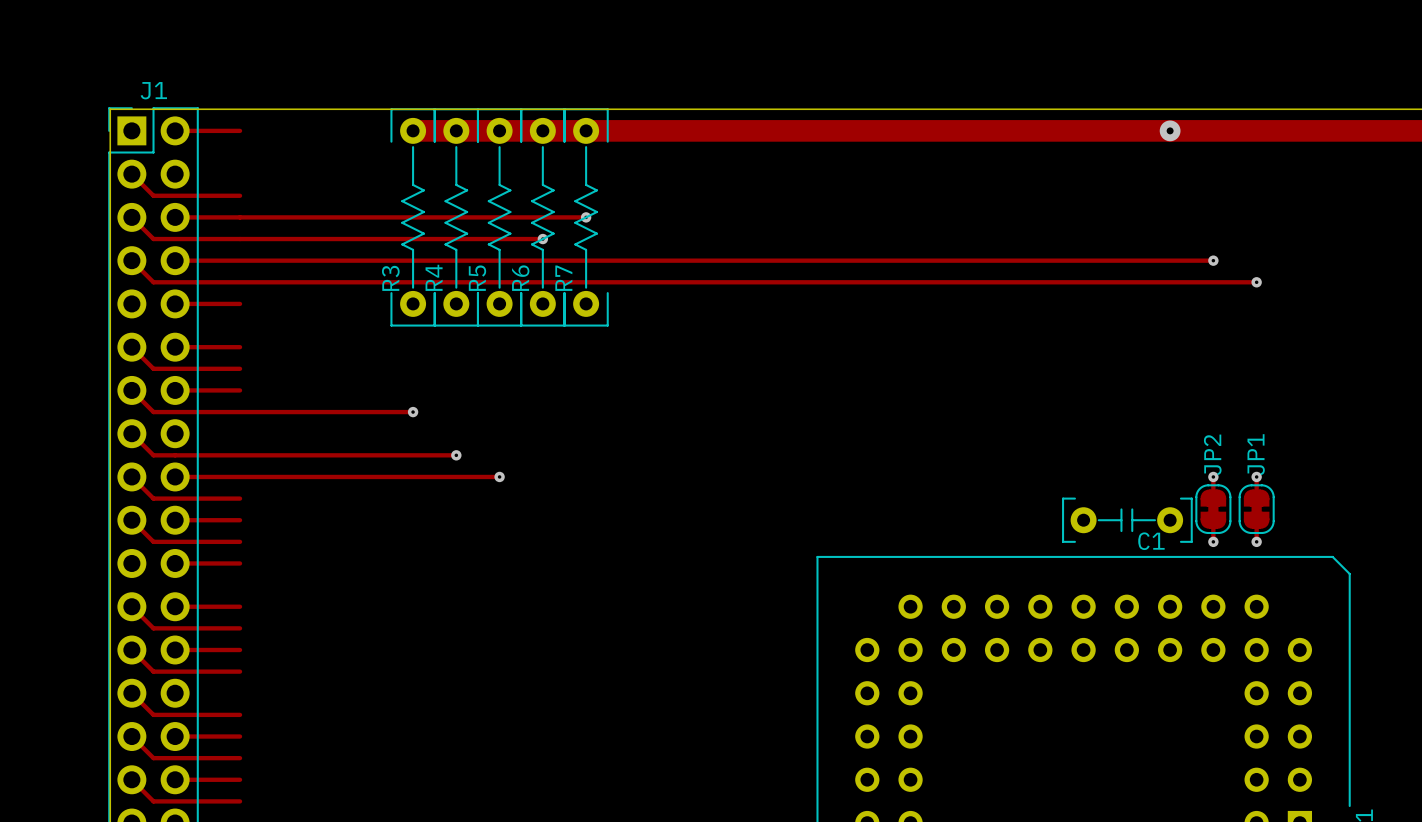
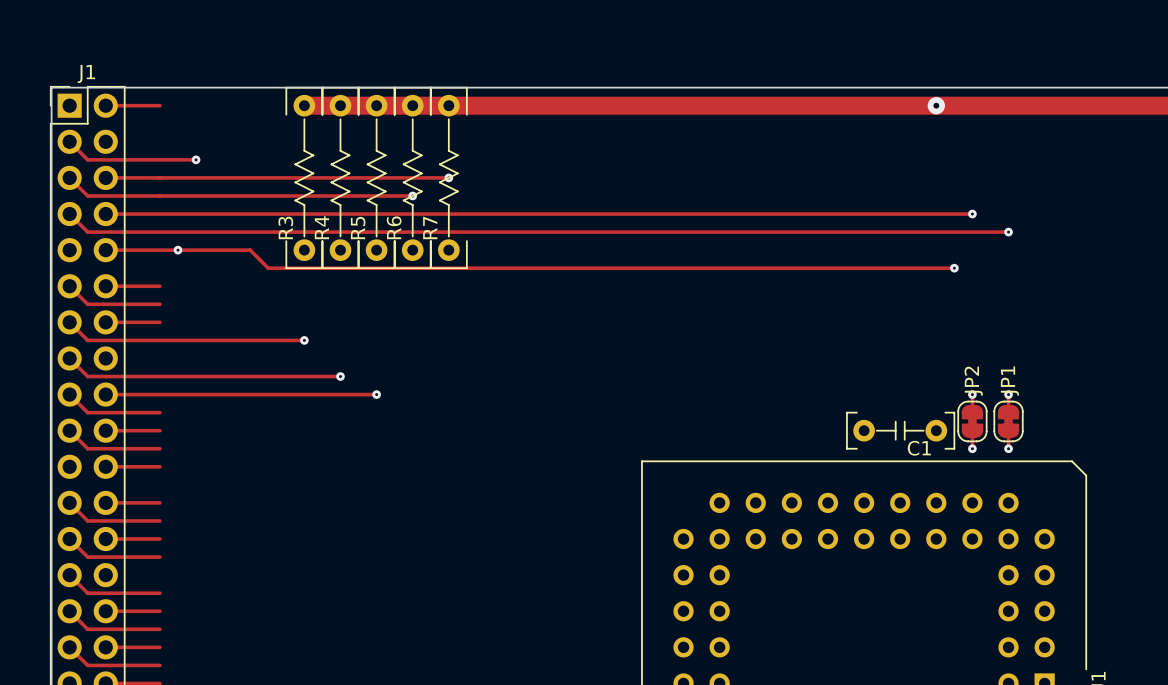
track: none -> (159, 159) (196, 159)
via: none -> (196, 159)
track: none -> (159, 250) (250, 250) (268, 268) (954, 268)
via: none -> (177, 250)
via: none -> (954, 268)

